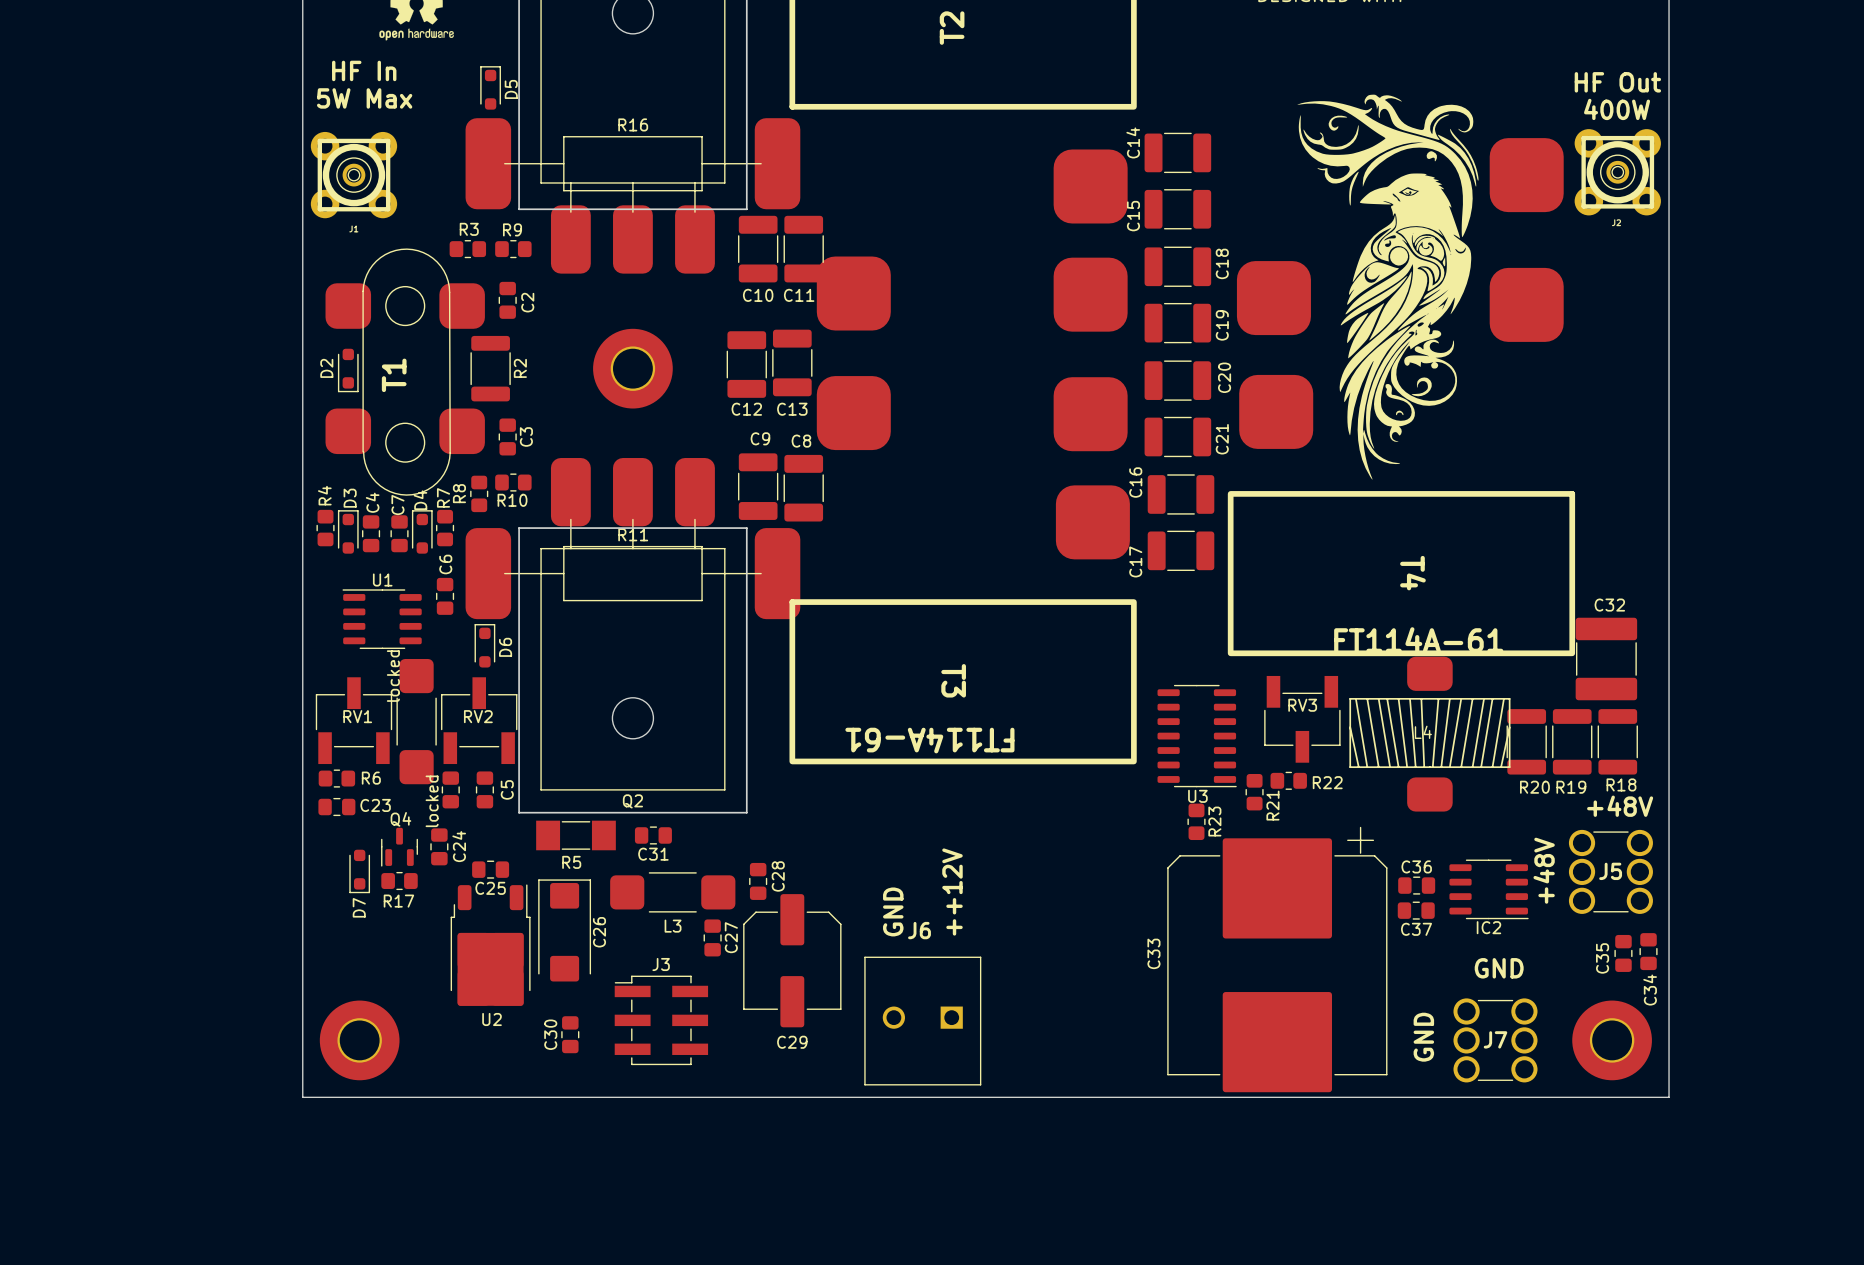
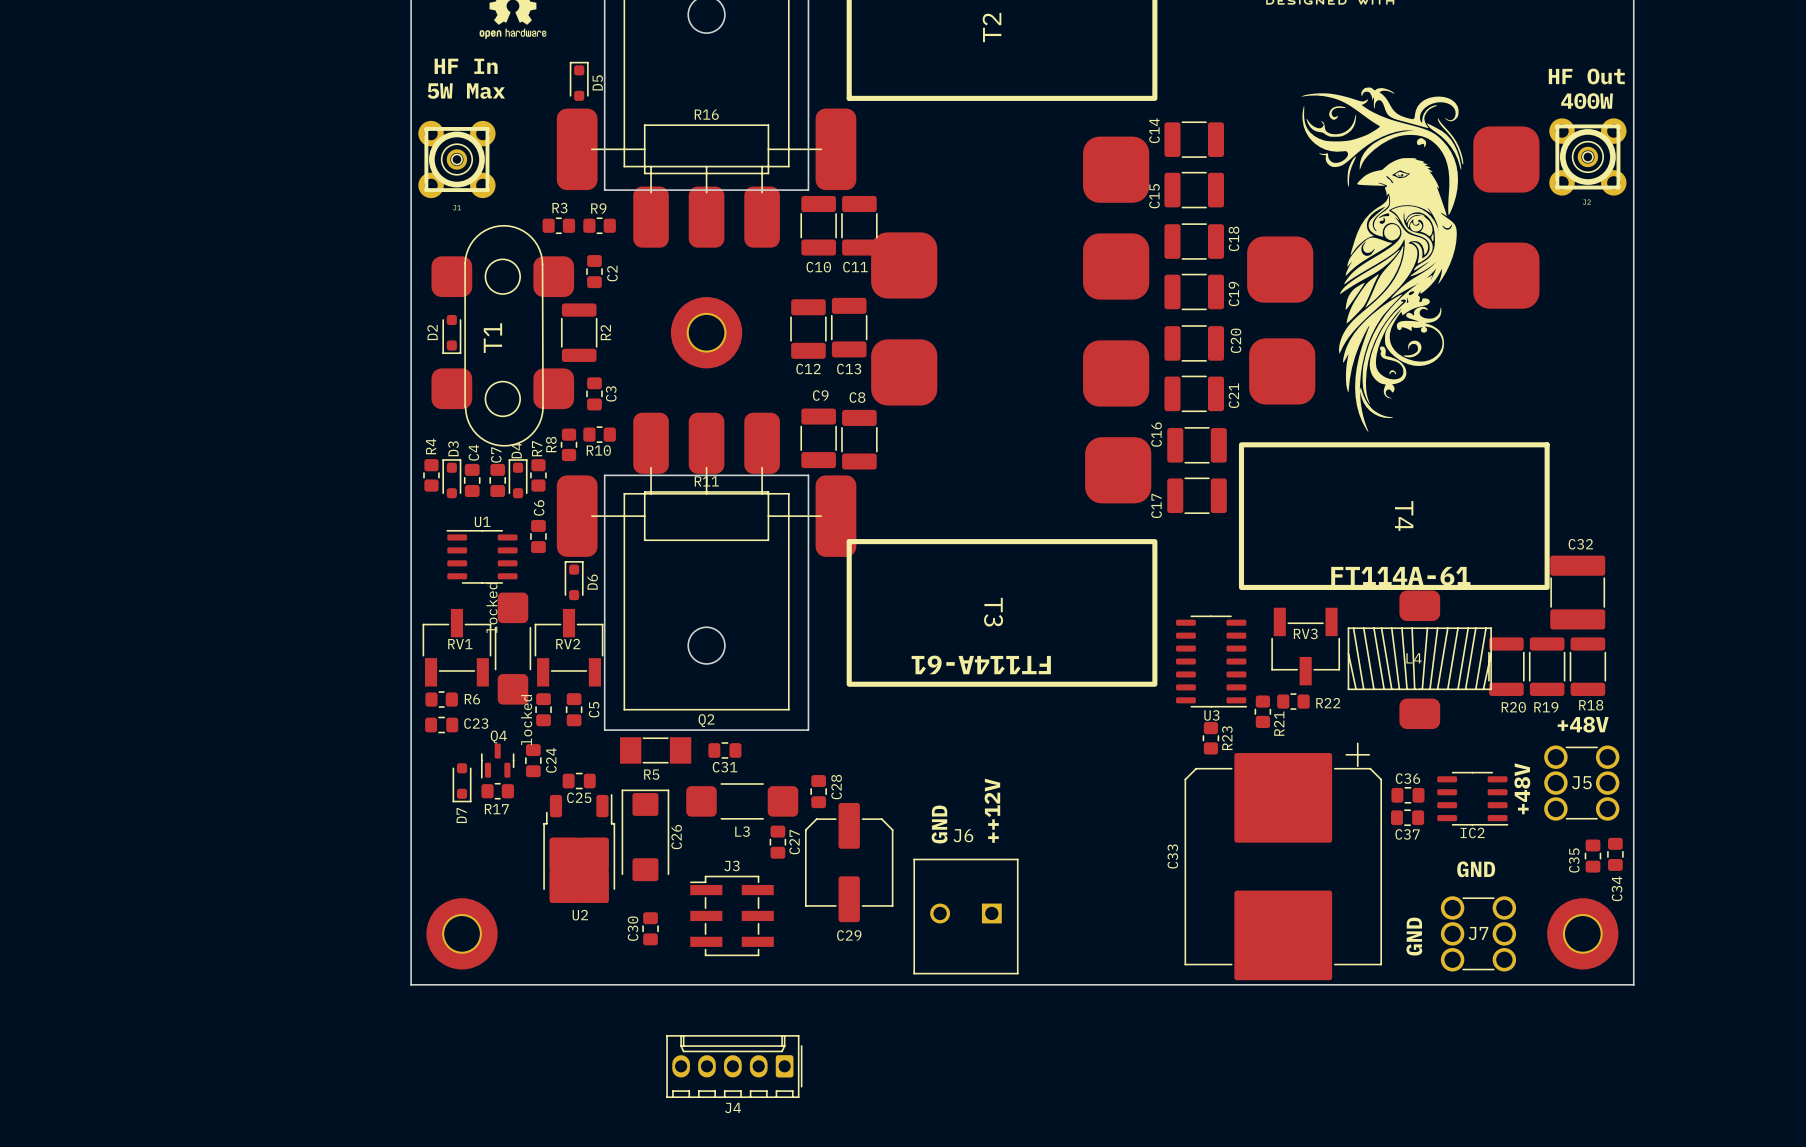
J4: none -> (734, 1066)

